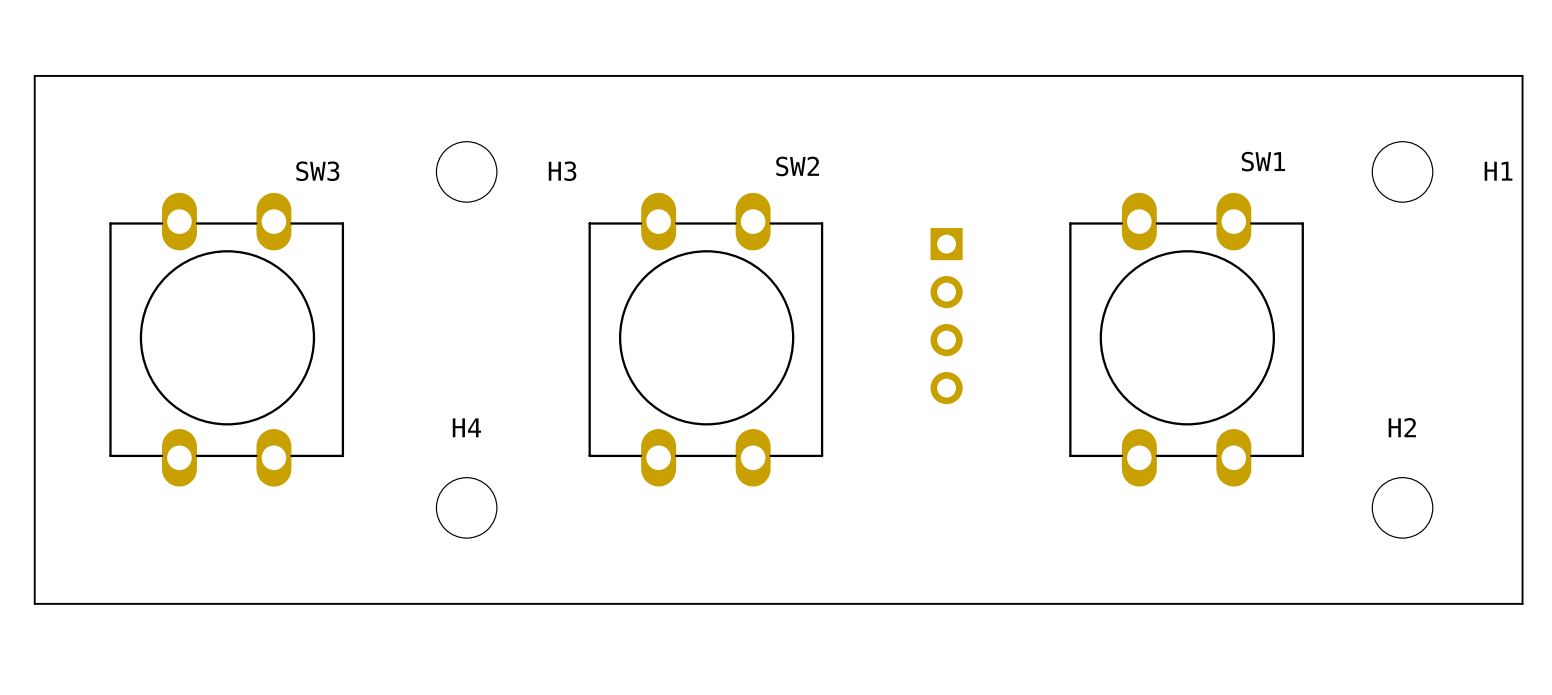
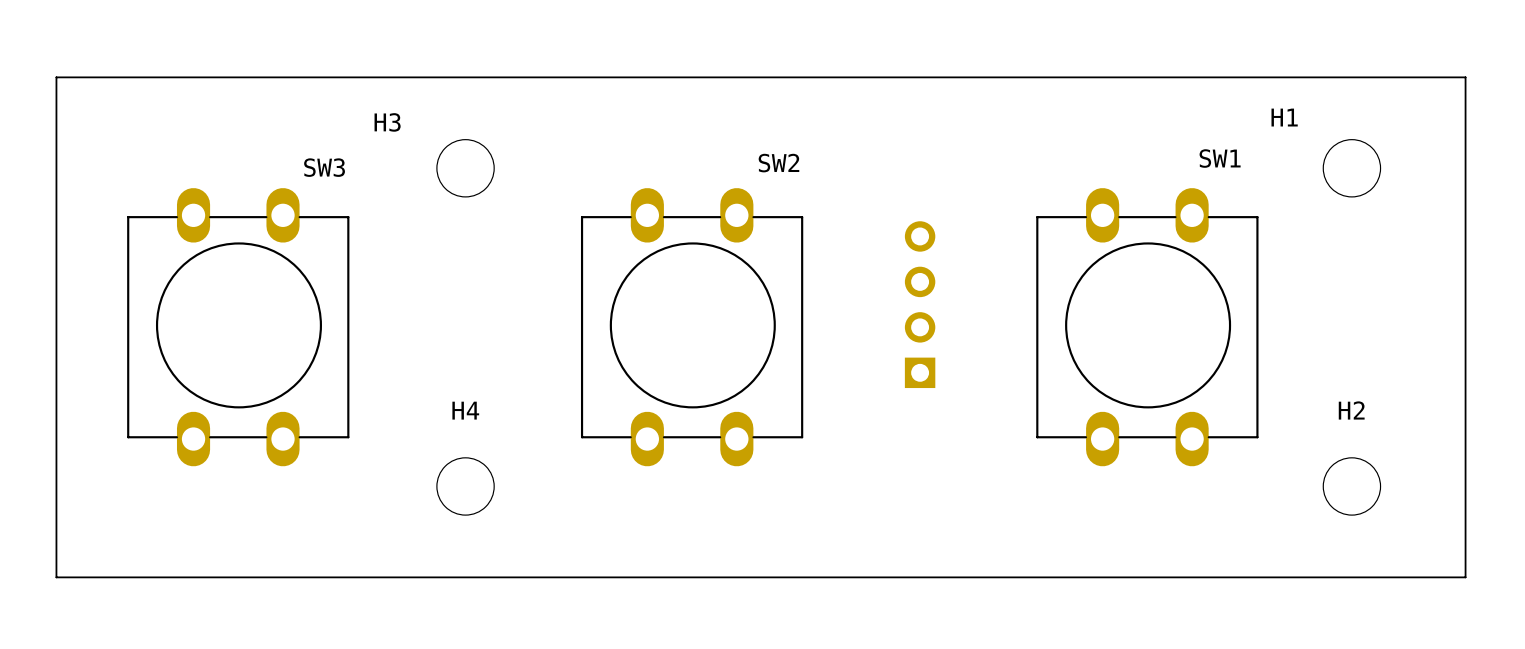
H3 name position: H3 (562, 171) -> H3 (387, 122)
H1 name position: H1 (1498, 171) -> H1 (1284, 117)
part rotation: 0° (946, 316) -> 180° (920, 304)

